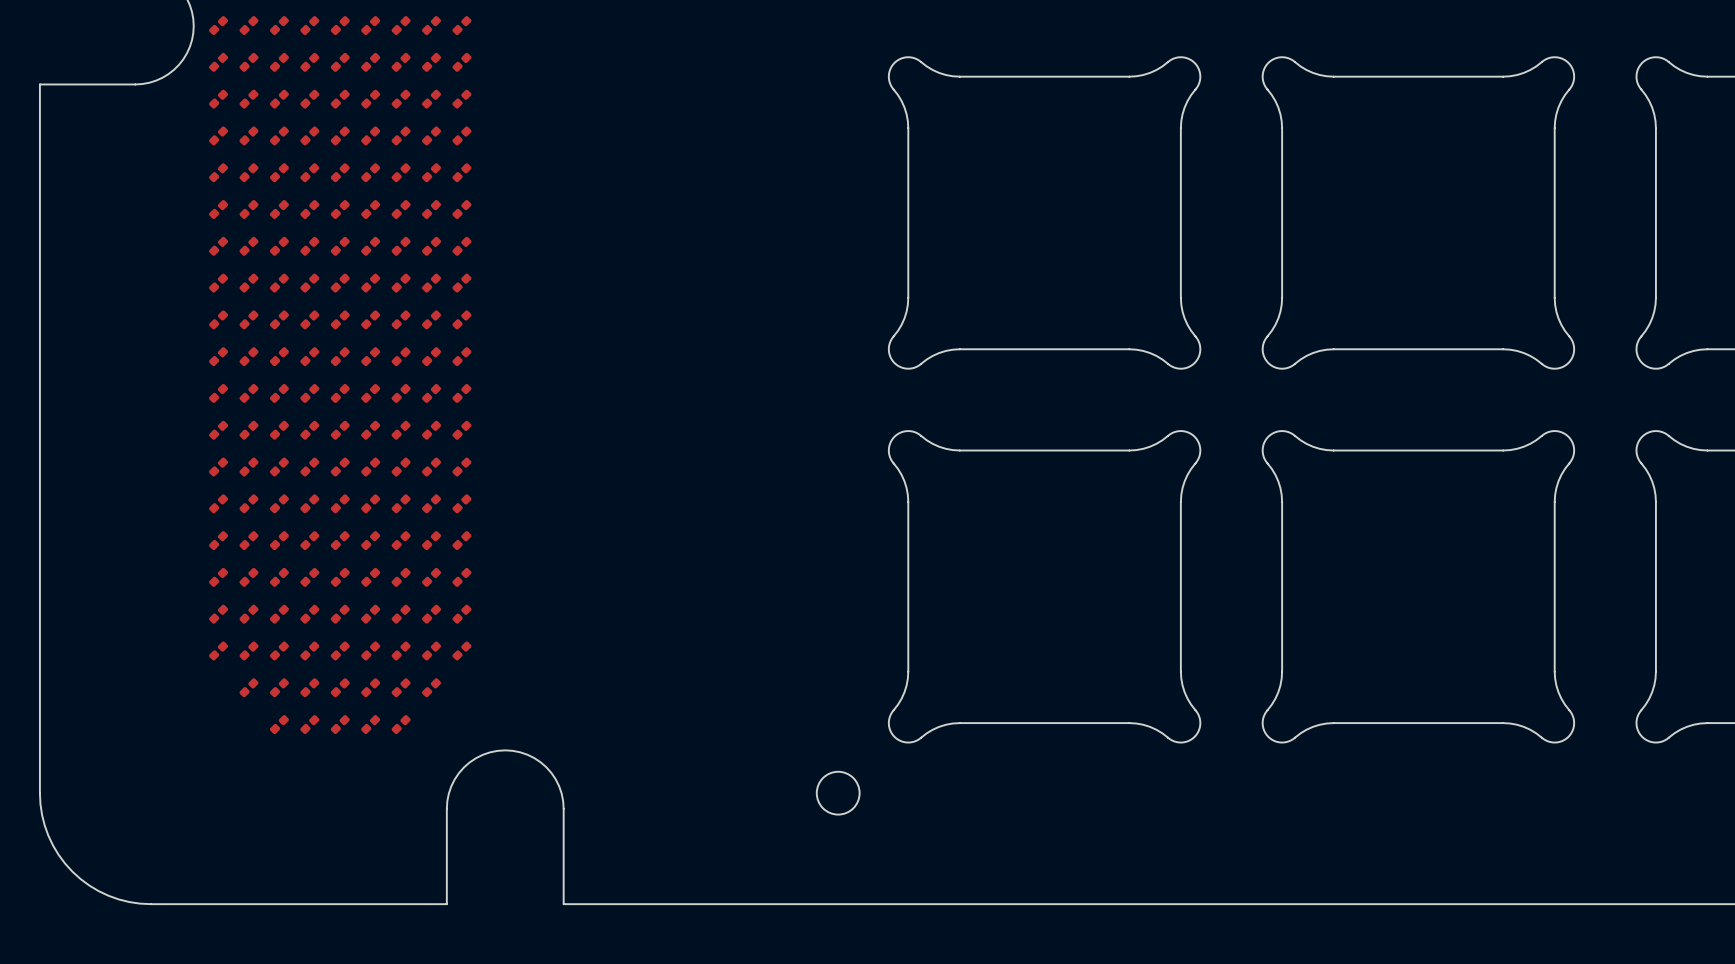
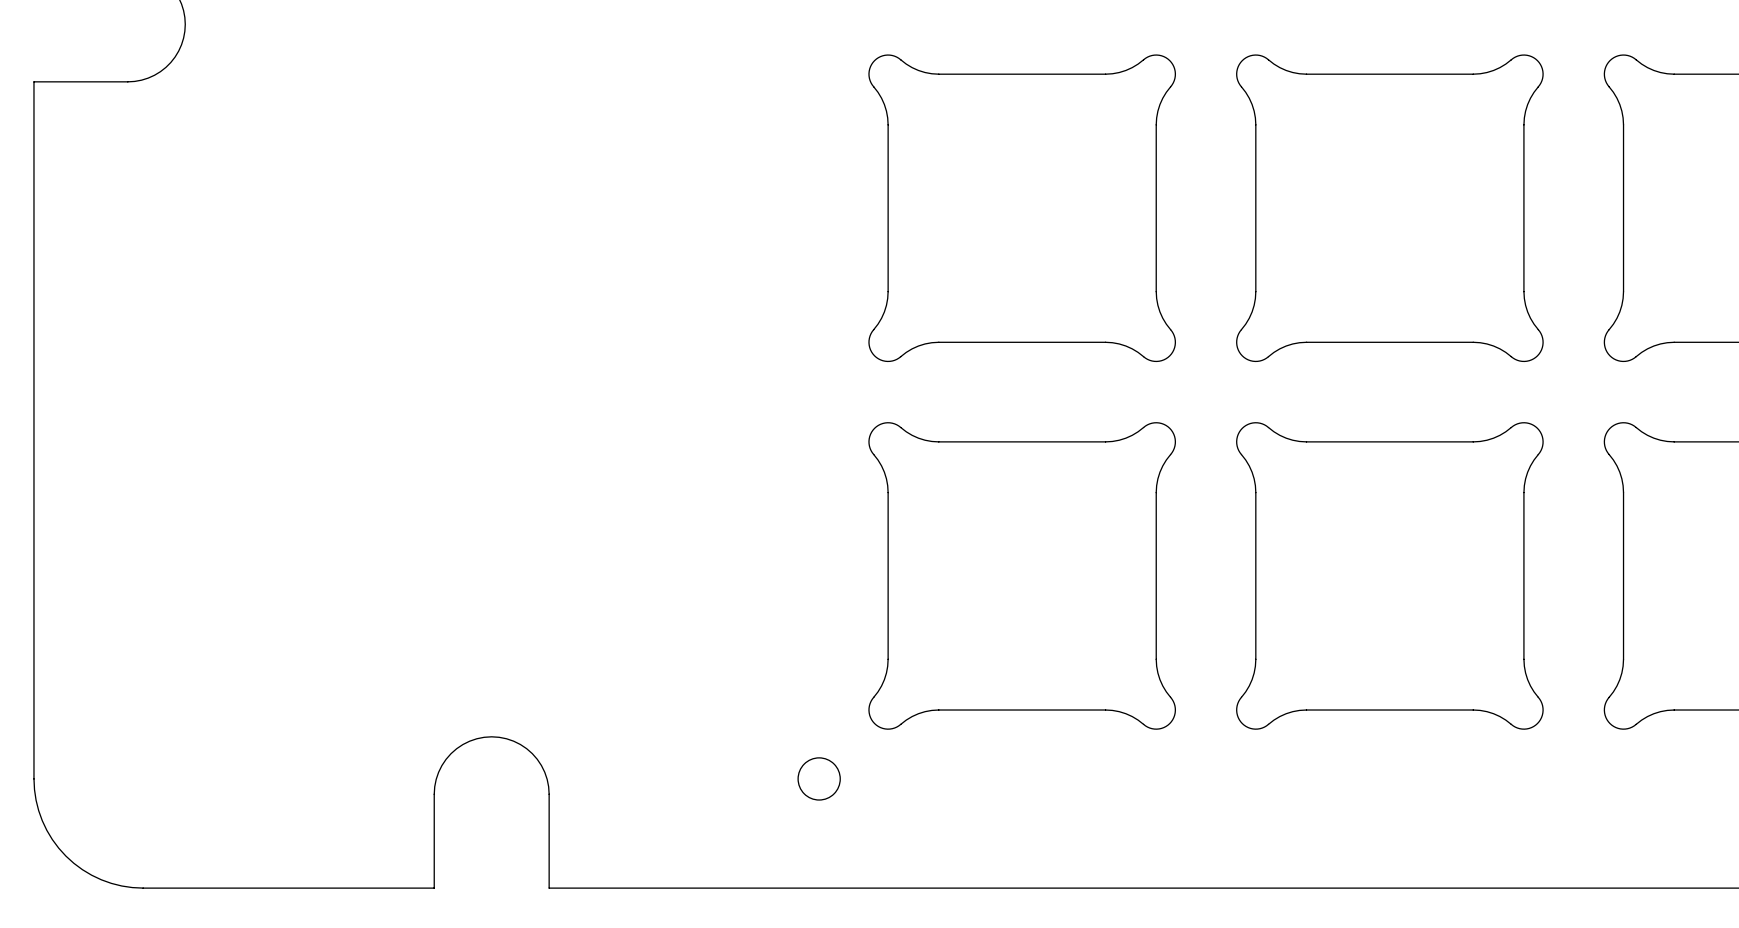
part: (218, 25) -> none
part: (248, 25) -> none
part: (279, 25) -> none
part: (309, 25) -> none
part: (340, 25) -> none
part: (370, 25) -> none
part: (401, 25) -> none
part: (431, 25) -> none
part: (461, 25) -> none
part: (218, 62) -> none
part: (248, 62) -> none
part: (279, 62) -> none
part: (309, 62) -> none
part: (340, 62) -> none
part: (370, 62) -> none
part: (401, 62) -> none
part: (431, 62) -> none
part: (461, 62) -> none
part: (218, 99) -> none
part: (248, 99) -> none
part: (279, 99) -> none
part: (309, 99) -> none
part: (340, 99) -> none
part: (370, 99) -> none
part: (401, 99) -> none
part: (431, 99) -> none
part: (461, 99) -> none
part: (218, 135) -> none
part: (248, 135) -> none
part: (279, 135) -> none
part: (309, 135) -> none
part: (340, 135) -> none
part: (370, 135) -> none
part: (401, 135) -> none
part: (431, 135) -> none
part: (461, 135) -> none
part: (218, 172) -> none
part: (248, 172) -> none
part: (279, 172) -> none
part: (309, 172) -> none
part: (340, 172) -> none
part: (370, 172) -> none
part: (401, 172) -> none
part: (431, 172) -> none
part: (461, 172) -> none
part: (218, 209) -> none
part: (248, 209) -> none
part: (279, 209) -> none
part: (309, 209) -> none
part: (340, 209) -> none
part: (370, 209) -> none
part: (401, 209) -> none
part: (431, 209) -> none
part: (461, 209) -> none
part: (218, 246) -> none
part: (248, 246) -> none
part: (279, 246) -> none
part: (309, 246) -> none
part: (340, 246) -> none
part: (370, 246) -> none
part: (401, 246) -> none
part: (431, 246) -> none
part: (461, 246) -> none
part: (218, 283) -> none
part: (248, 283) -> none
part: (279, 283) -> none
part: (309, 283) -> none
part: (340, 283) -> none
part: (370, 283) -> none
part: (401, 283) -> none
part: (431, 283) -> none
part: (461, 283) -> none
part: (218, 319) -> none
part: (248, 319) -> none
part: (279, 319) -> none
part: (309, 319) -> none
part: (340, 319) -> none
part: (370, 319) -> none
part: (401, 319) -> none
part: (431, 319) -> none
part: (461, 319) -> none
part: (218, 356) -> none
part: (248, 356) -> none
part: (279, 356) -> none
part: (309, 356) -> none
part: (340, 356) -> none
part: (370, 356) -> none
part: (401, 356) -> none
part: (431, 356) -> none
part: (461, 356) -> none
part: (218, 393) -> none
part: (248, 393) -> none
part: (279, 393) -> none
part: (309, 393) -> none
part: (340, 393) -> none
part: (370, 393) -> none
part: (401, 393) -> none
part: (431, 393) -> none
part: (461, 393) -> none
part: (218, 430) -> none
part: (248, 430) -> none
part: (279, 430) -> none
part: (309, 430) -> none
part: (340, 430) -> none
part: (370, 430) -> none
part: (401, 430) -> none
part: (431, 430) -> none
part: (461, 430) -> none
part: (218, 467) -> none
part: (248, 467) -> none
part: (279, 467) -> none
part: (309, 467) -> none
part: (340, 467) -> none
part: (370, 467) -> none
part: (401, 467) -> none
part: (431, 467) -> none
part: (461, 467) -> none
part: (218, 503) -> none
part: (248, 503) -> none
part: (279, 503) -> none
part: (309, 503) -> none
part: (340, 503) -> none
part: (370, 503) -> none
part: (401, 503) -> none
part: (431, 503) -> none
part: (461, 503) -> none
part: (218, 540) -> none
part: (248, 540) -> none
part: (279, 540) -> none
part: (309, 540) -> none
part: (340, 540) -> none
part: (370, 540) -> none
part: (401, 540) -> none
part: (431, 540) -> none
part: (461, 540) -> none
part: (218, 577) -> none
part: (248, 577) -> none
part: (279, 577) -> none
part: (309, 577) -> none
part: (340, 577) -> none
part: (370, 577) -> none
part: (401, 577) -> none
part: (431, 577) -> none
part: (461, 577) -> none
part: (218, 614) -> none
part: (248, 614) -> none
part: (279, 614) -> none
part: (309, 614) -> none
part: (340, 614) -> none
part: (370, 614) -> none
part: (401, 614) -> none
part: (431, 614) -> none
part: (461, 614) -> none
part: (218, 650) -> none
part: (248, 650) -> none
part: (279, 650) -> none
part: (309, 650) -> none
part: (340, 650) -> none
part: (370, 650) -> none
part: (401, 650) -> none
part: (431, 650) -> none
part: (461, 650) -> none
part: (248, 687) -> none
part: (279, 687) -> none
part: (309, 687) -> none
part: (340, 687) -> none
part: (370, 687) -> none
part: (401, 687) -> none
part: (431, 687) -> none
part: (279, 724) -> none
part: (309, 724) -> none
part: (340, 724) -> none
part: (370, 724) -> none
part: (401, 724) -> none

